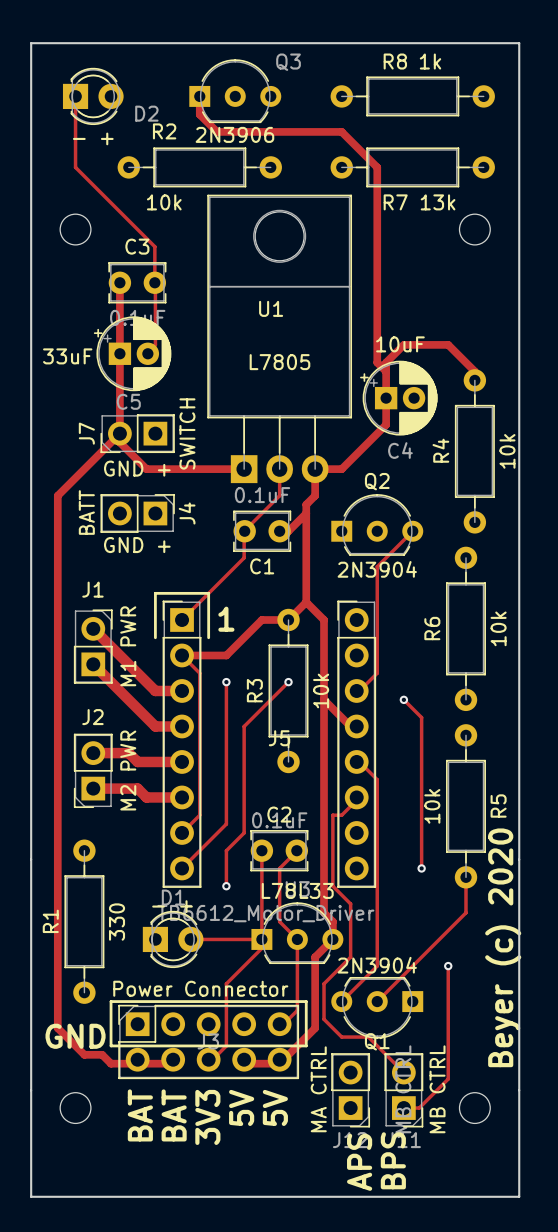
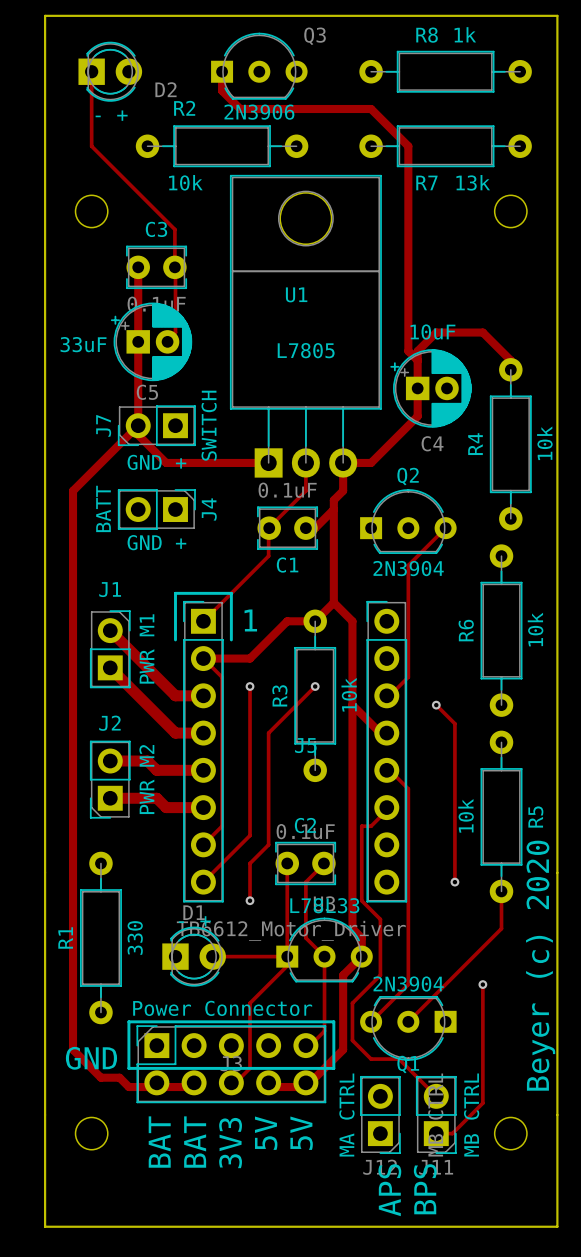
J1 value: M1 PWR (128, 646) -> PWR M1 (147, 648)
J2 value: M2 PWR (128, 770) -> PWR M2 (146, 779)

